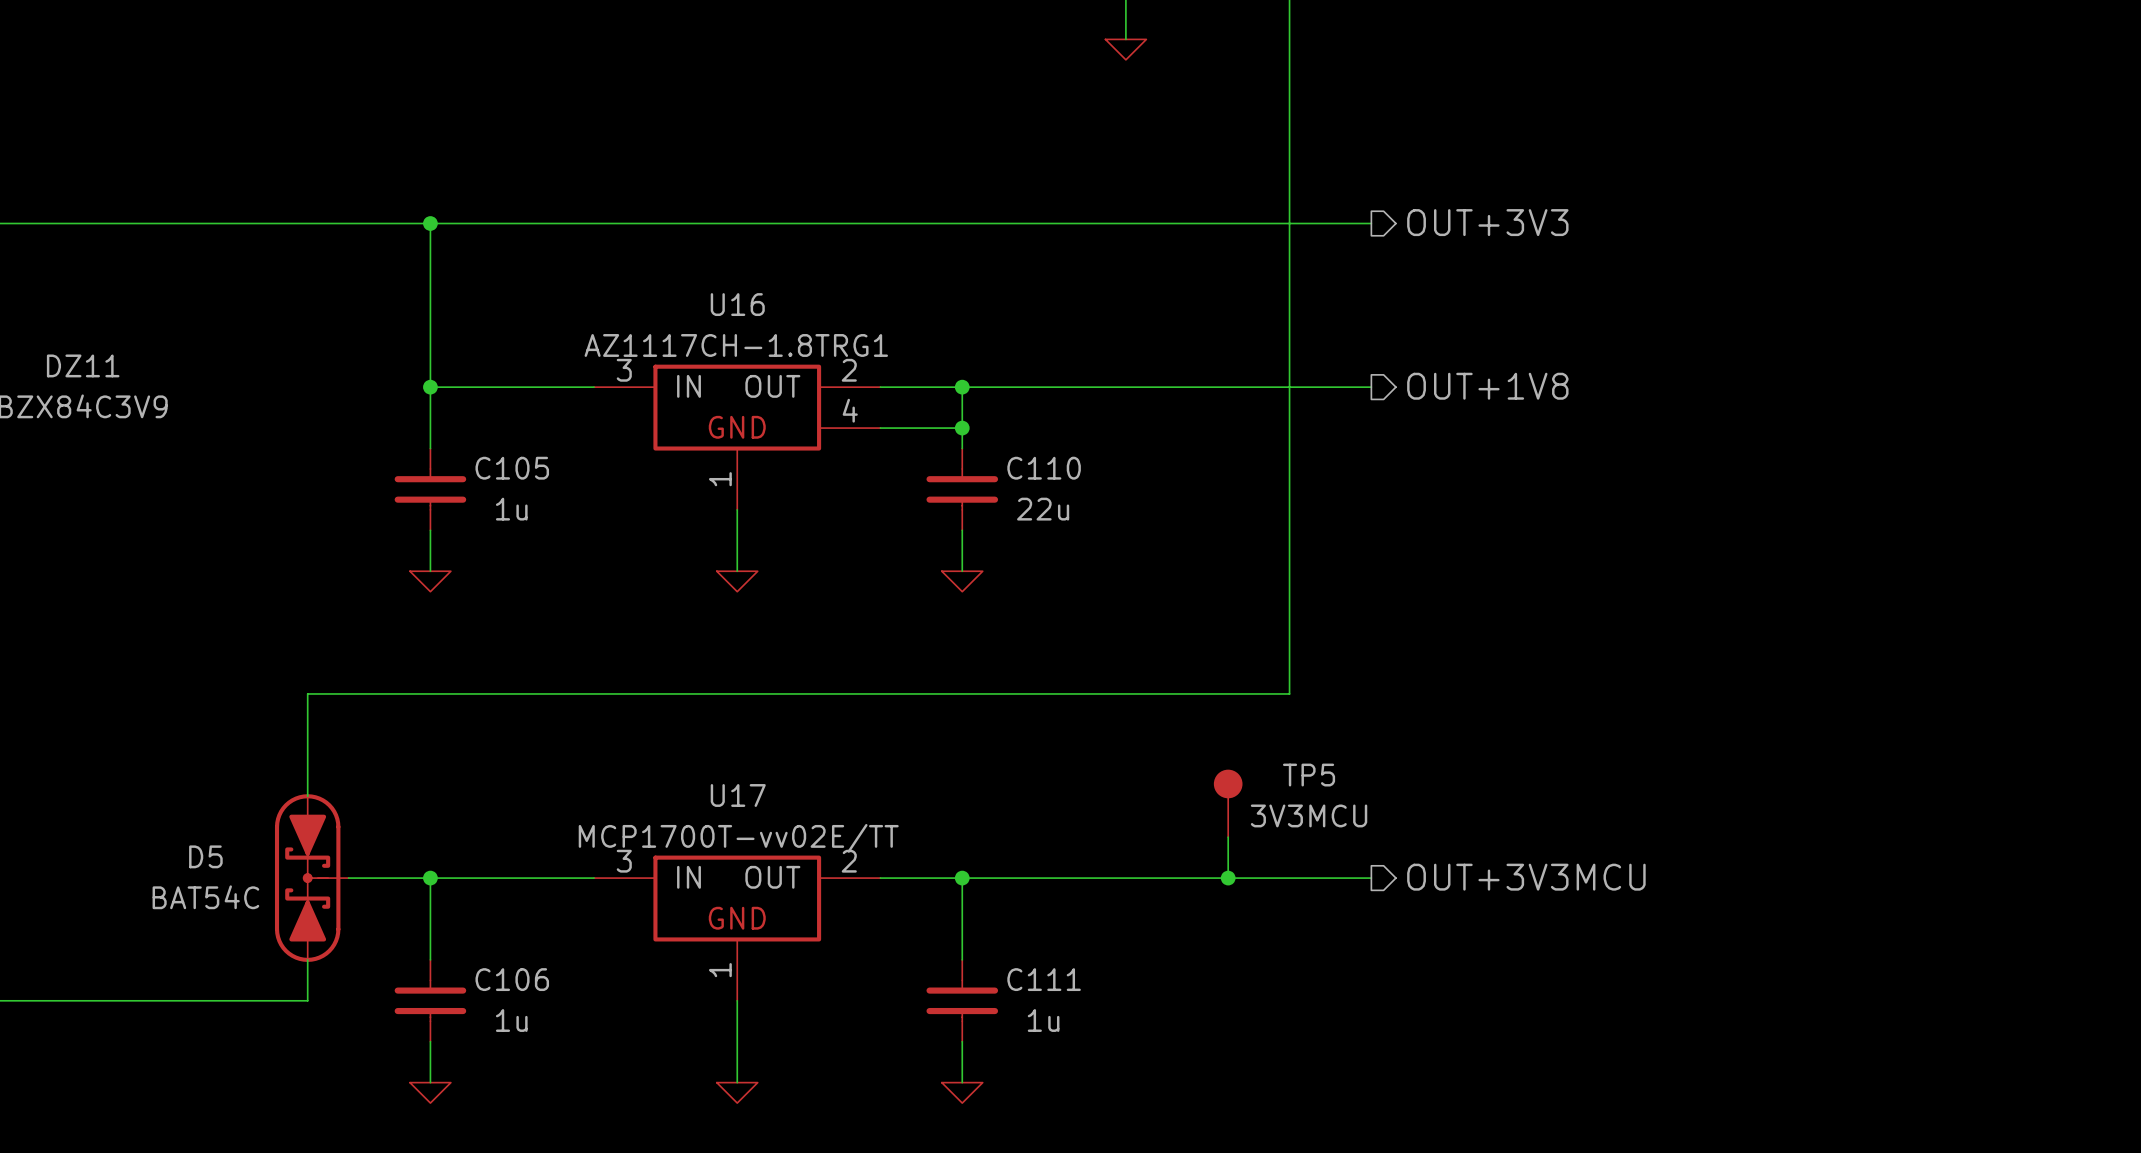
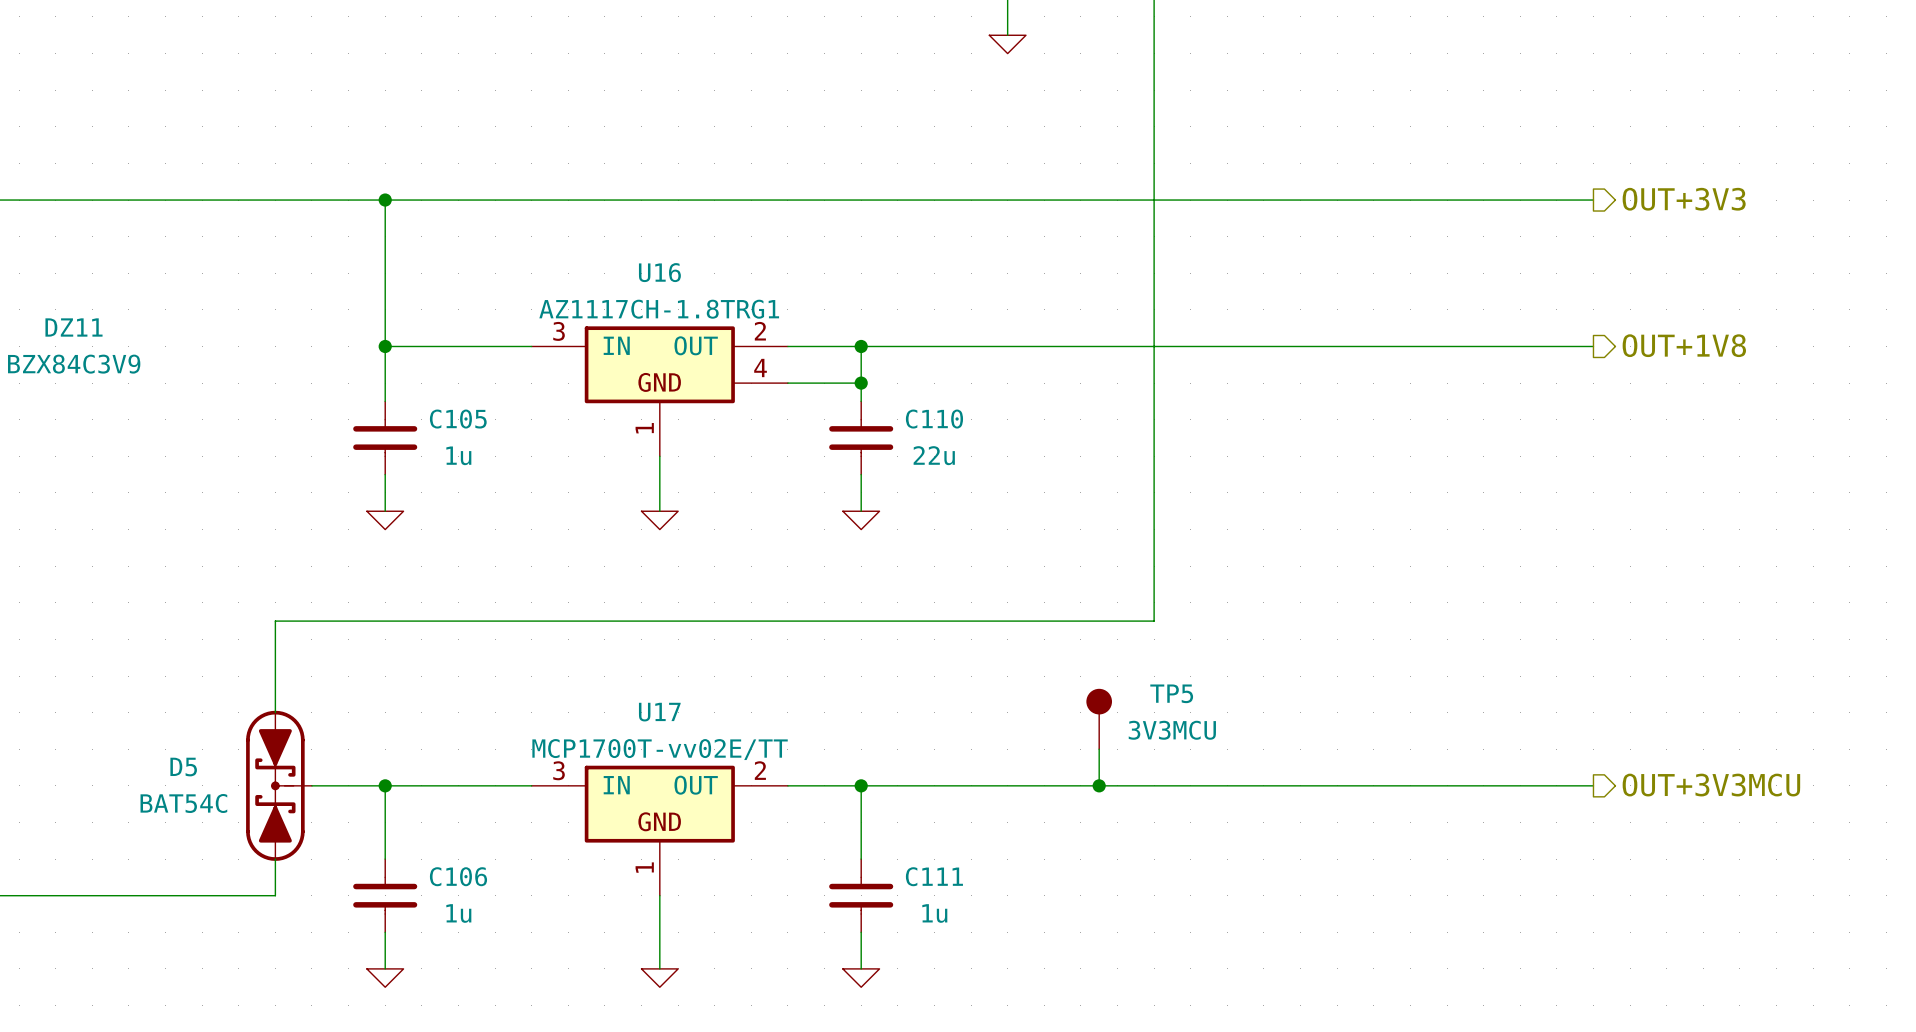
hierarchical label: OUT+3V3 (1487, 222) -> none
hierarchical label: none -> OUT+3V3 (1684, 199)
wire: none -> (1227, 200) (1593, 200)
hierarchical label: OUT+1V8 (1487, 386) -> none
hierarchical label: none -> OUT+1V8 (1684, 345)
wire: none -> (1227, 346) (1593, 346)
hierarchical label: OUT+3V3MCU (1526, 877) -> none
hierarchical label: none -> OUT+3V3MCU (1711, 785)
wire: none -> (1227, 785) (1593, 785)

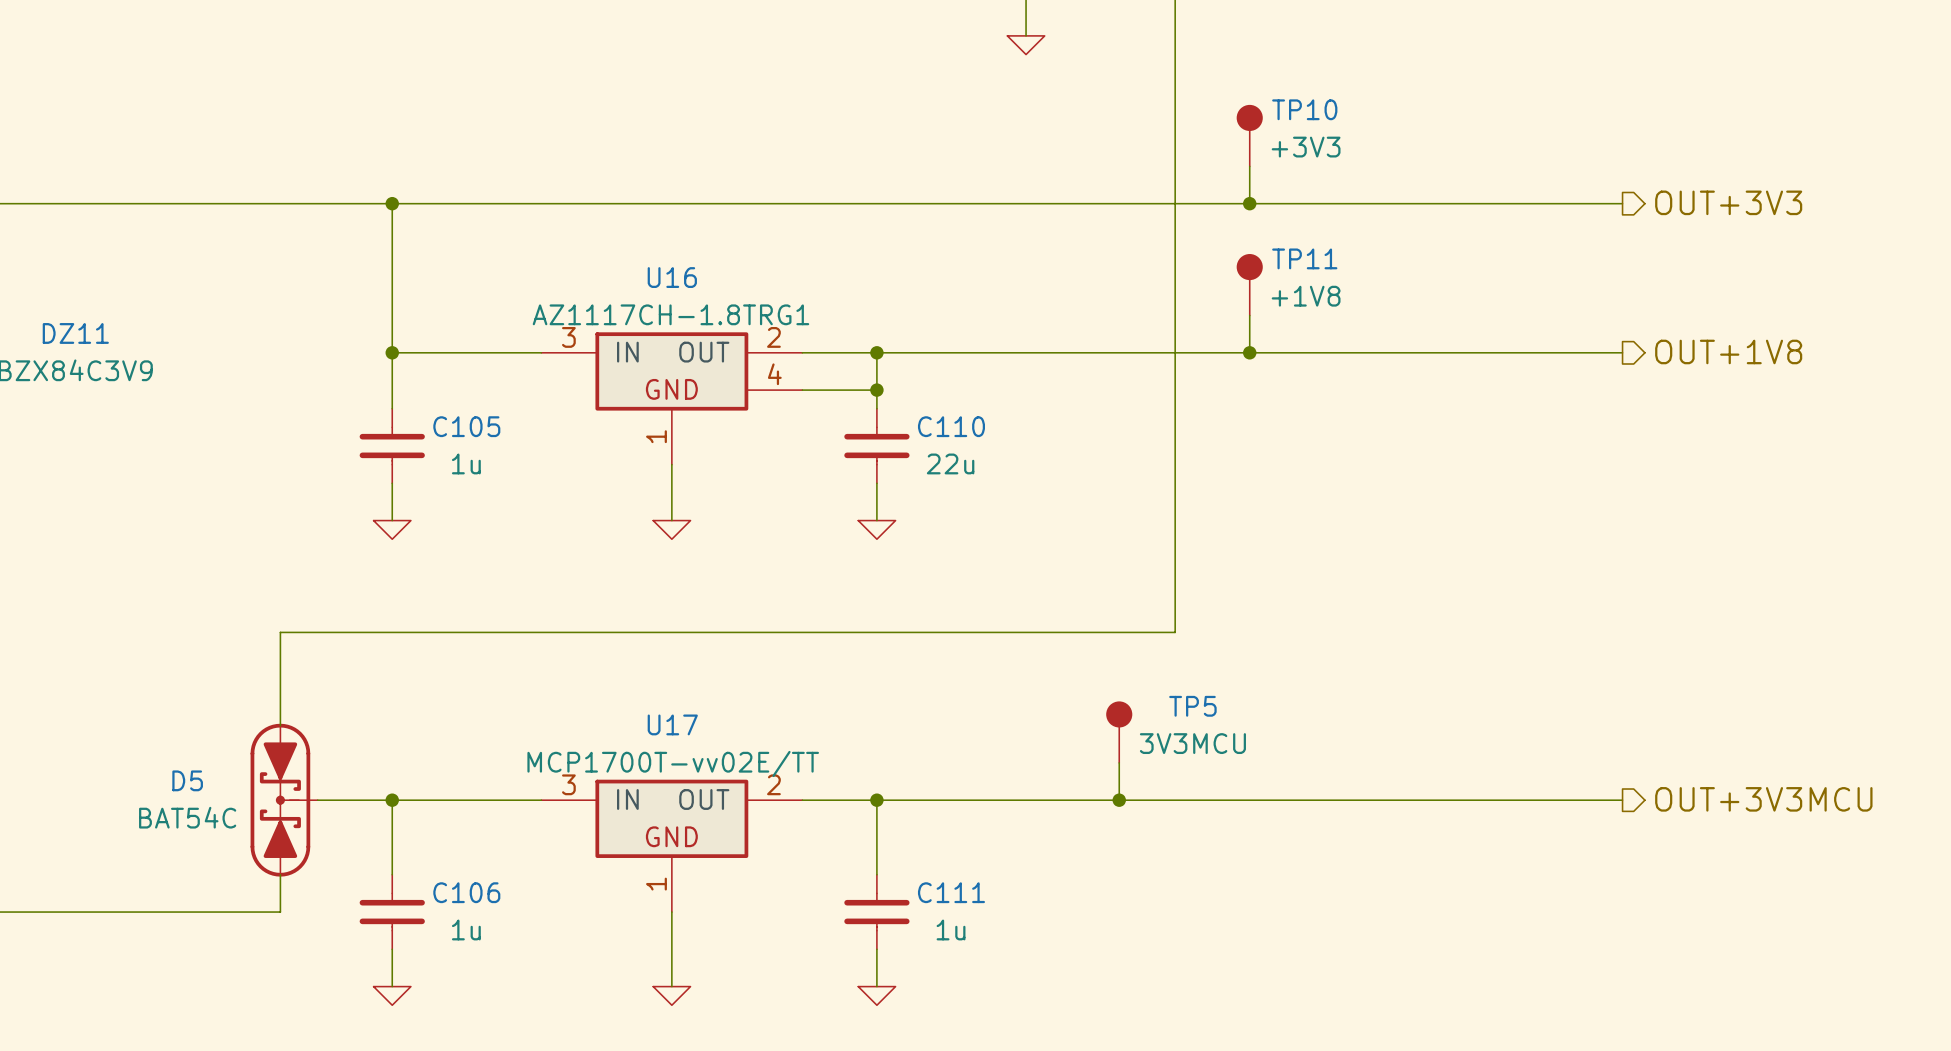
TP10: none -> +3V3 (1249, 135)
wire: none -> (1249, 166) (1249, 203)
junction: none -> (1249, 203)
TP11: none -> +1V8 (1249, 284)
wire: none -> (1249, 315) (1249, 352)
junction: none -> (1249, 352)

